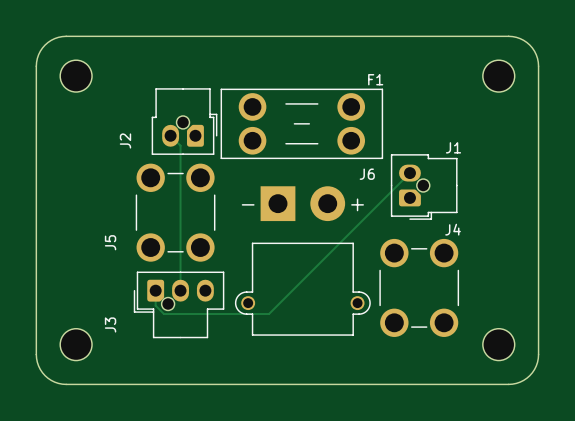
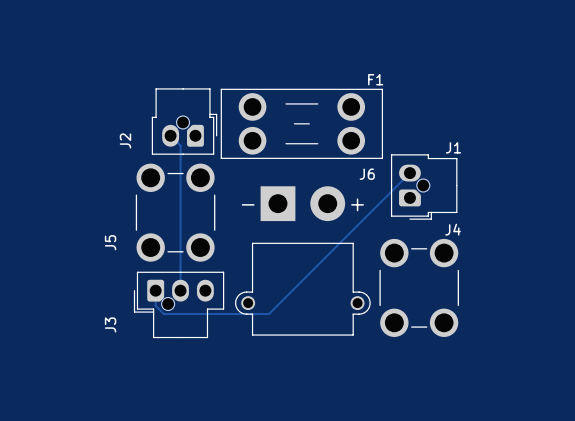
board edge: (66, 36) (508, 36) (516, 37) (526, 42) (534, 51) (538, 66) (538, 354) (537, 362) (532, 372) (520, 382) (508, 384) (66, 384) (58, 383) (48, 378) (38, 365) (36, 354) (36, 66) (38, 54) (45, 45) (54, 38) (66, 36) -> none
part: (76, 76) -> none
part: (498, 76) -> none
part: (76, 344) -> none
part: (498, 344) -> none

